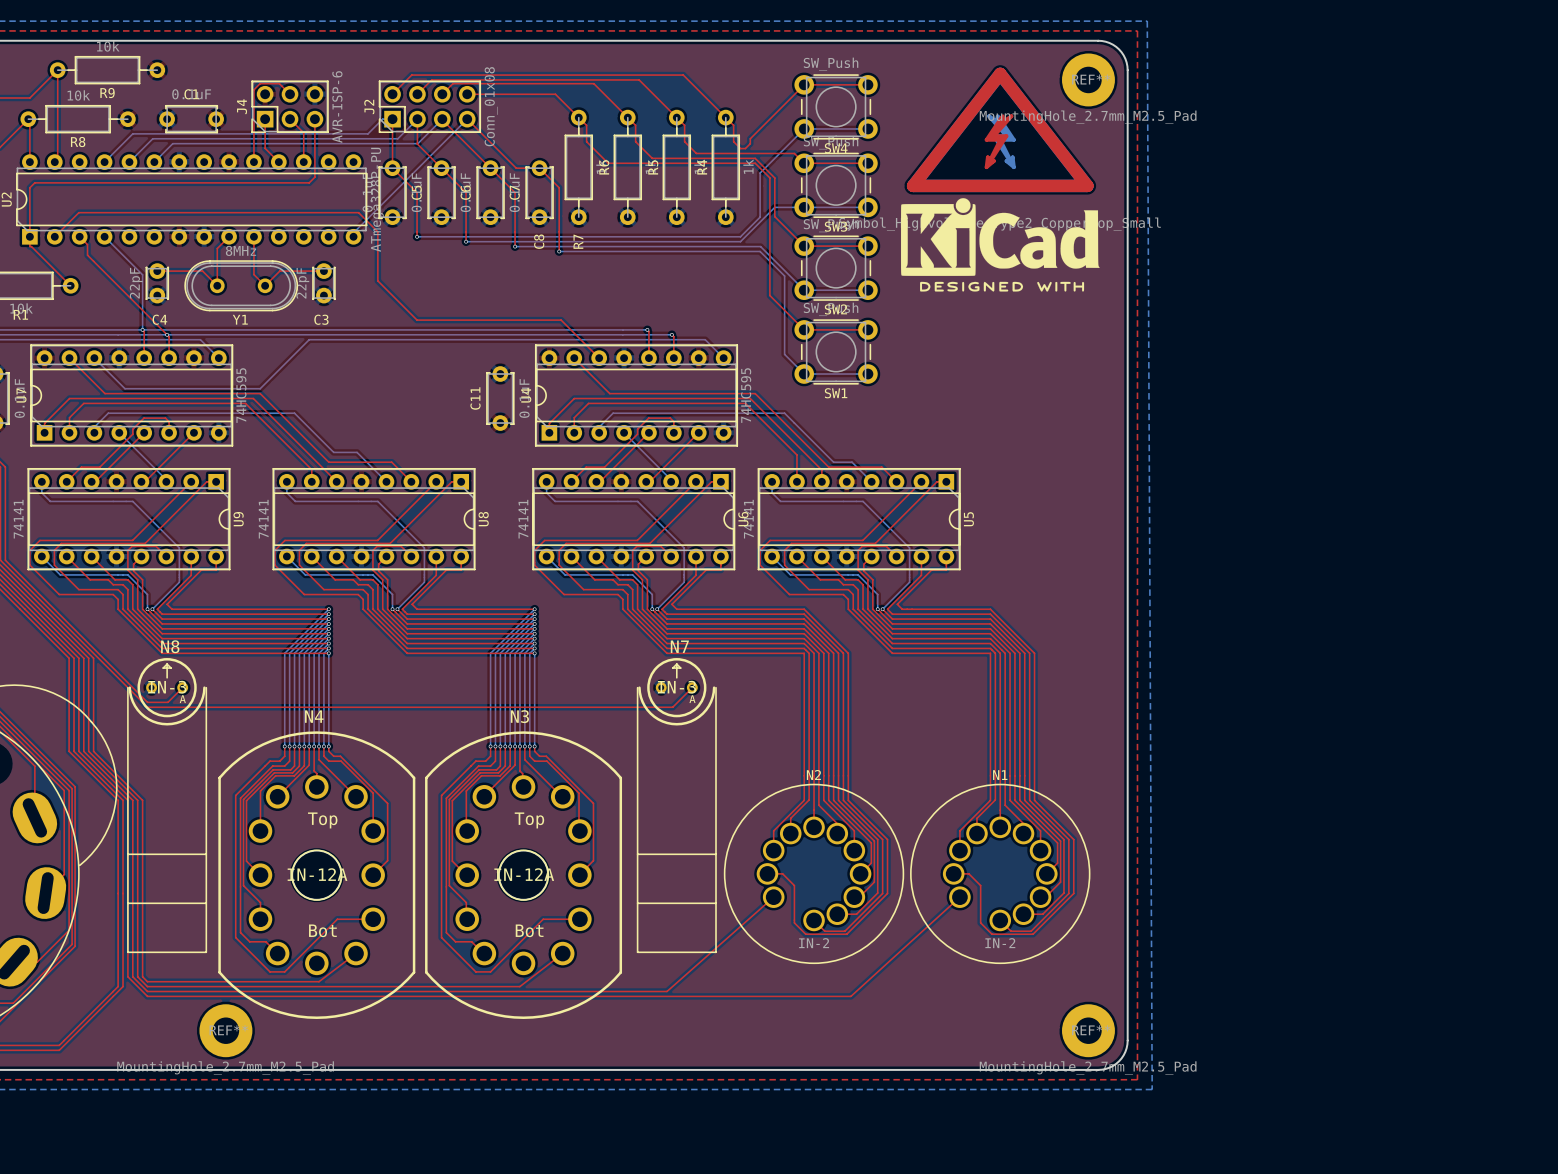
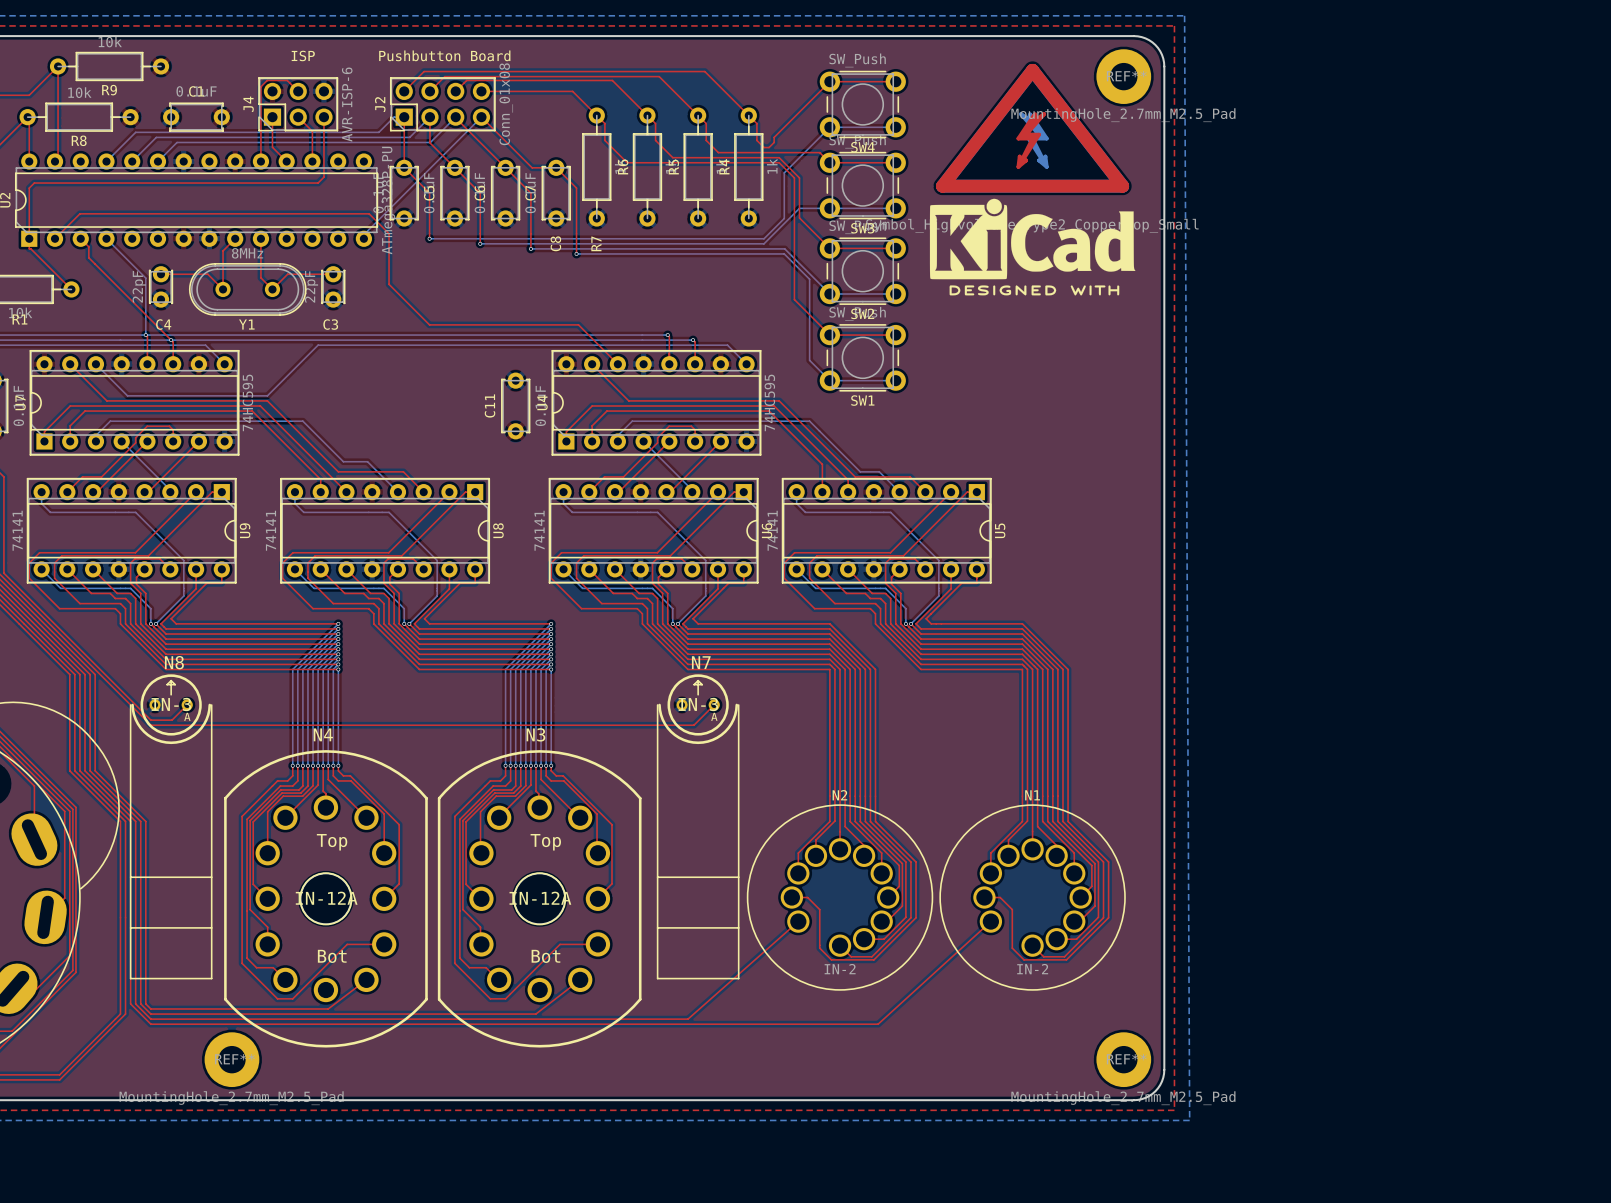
text: none -> Pushbutton Board (444, 55)
text: none -> ISP (303, 55)

